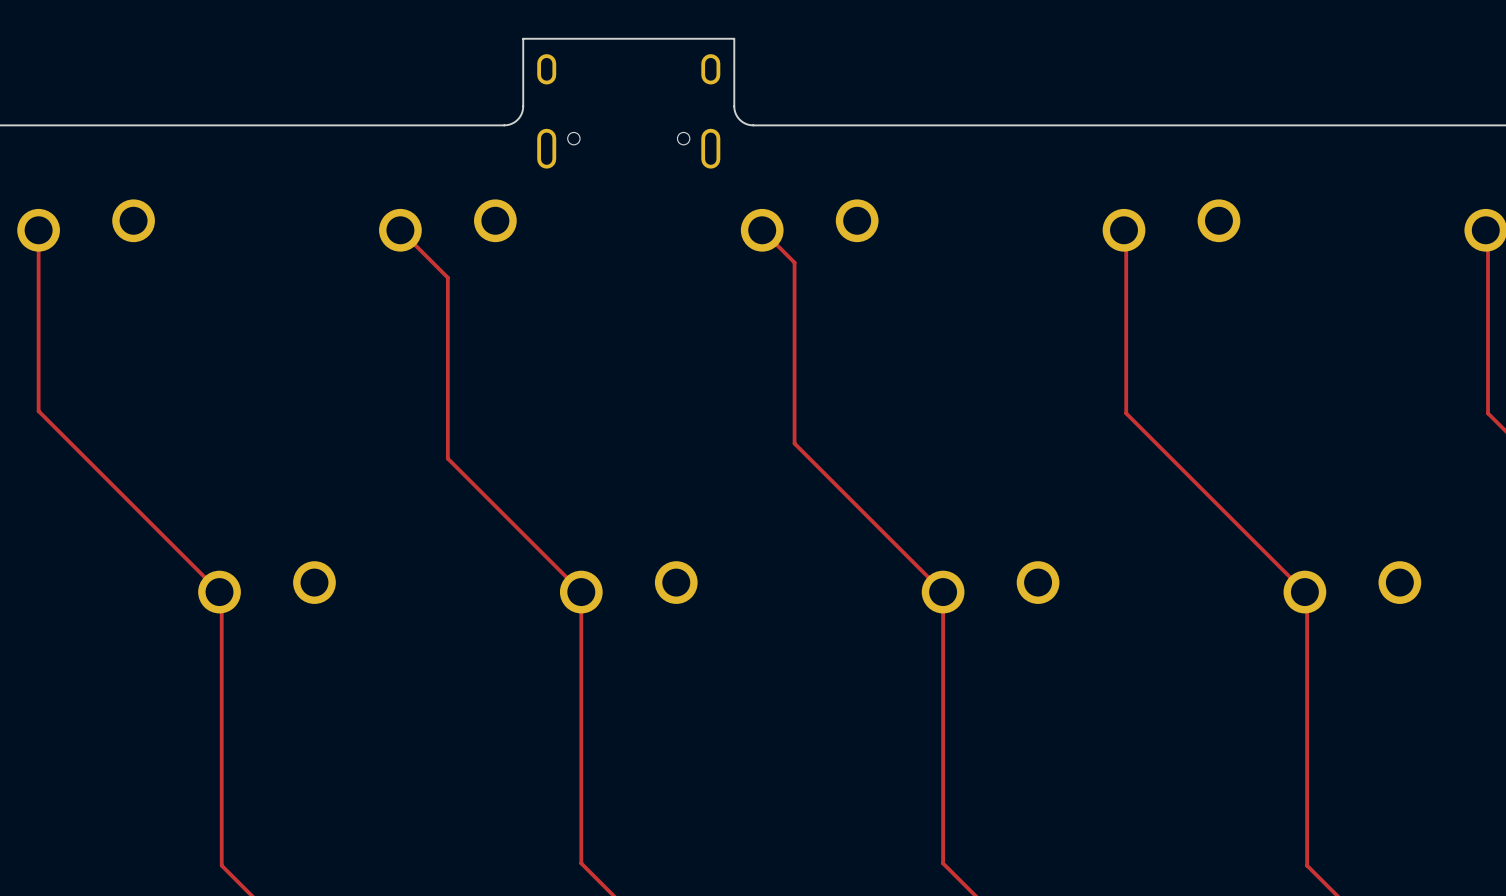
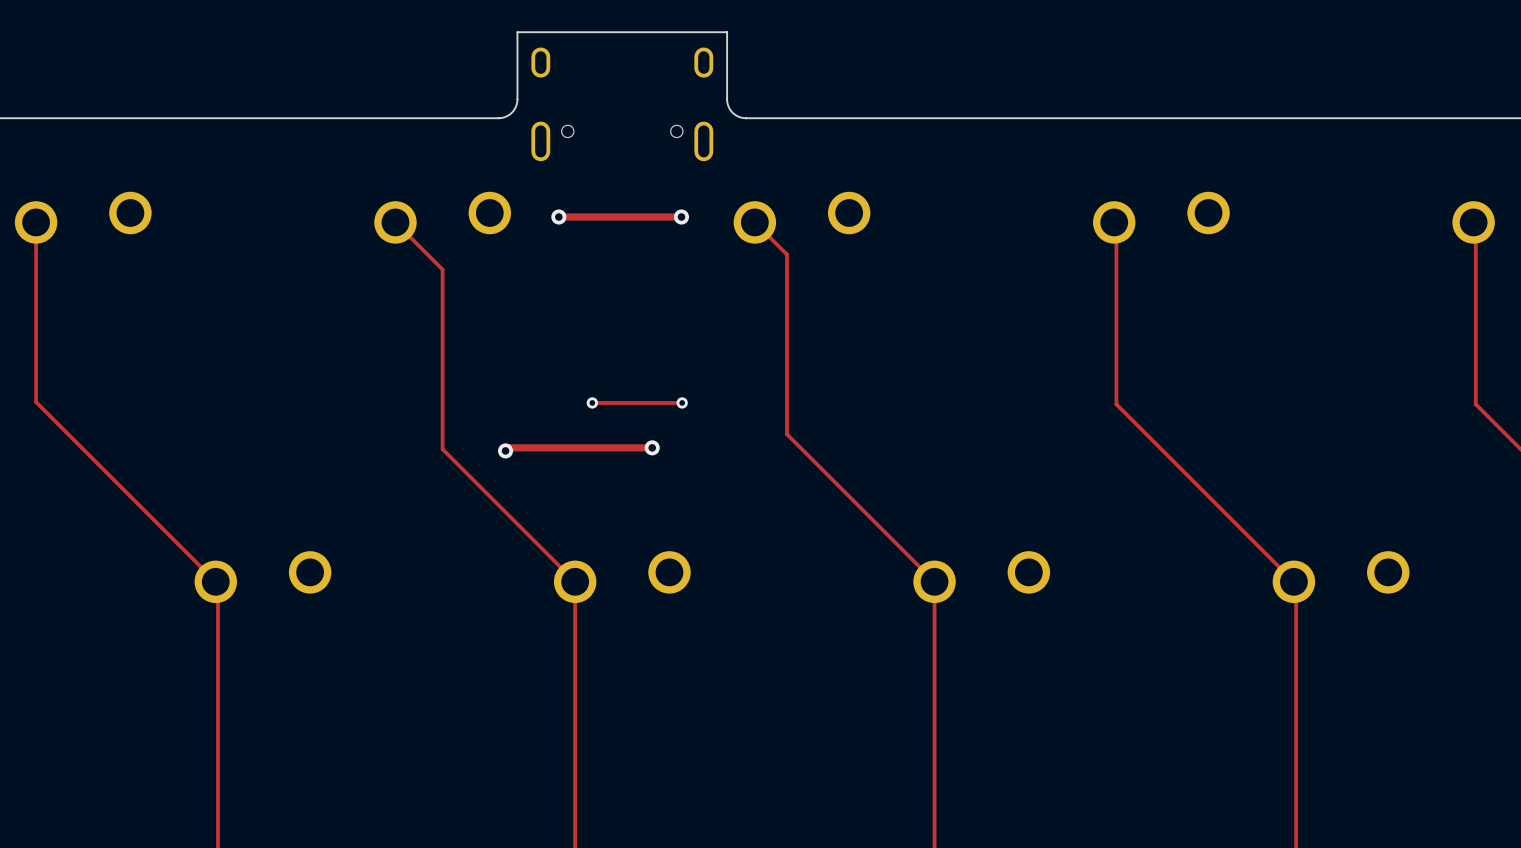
track: none -> (558, 217) (681, 217)
via: none -> (558, 217)
via: none -> (681, 217)
track: none -> (592, 402) (682, 402)
via: none -> (592, 402)
via: none -> (682, 402)
track: none -> (652, 447) (508, 447) (505, 450)
via: none -> (652, 447)
via: none -> (505, 450)

